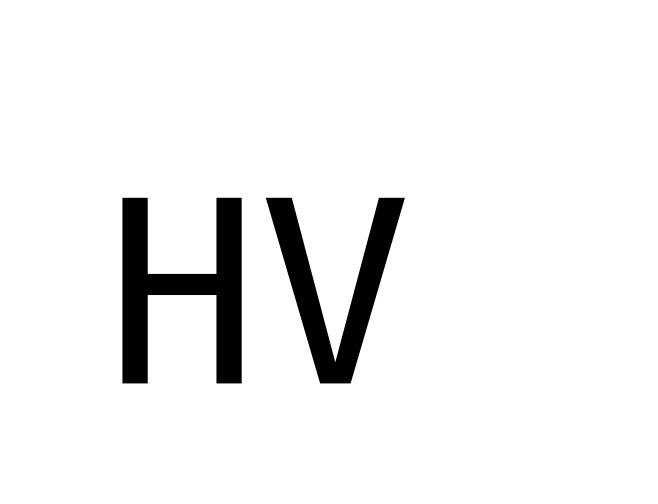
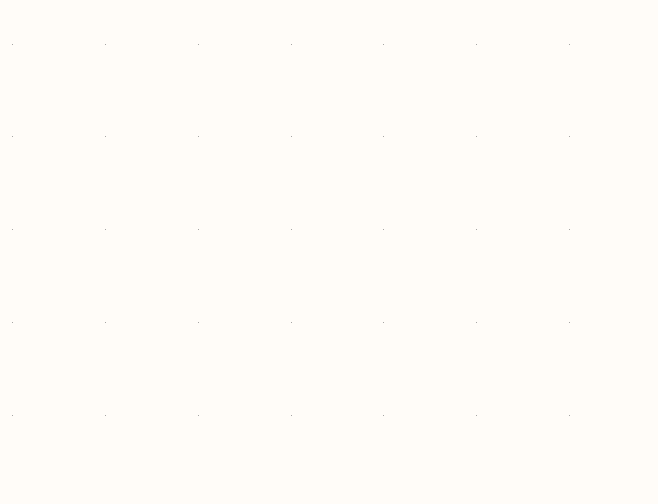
text: HV (263, 290) -> none

